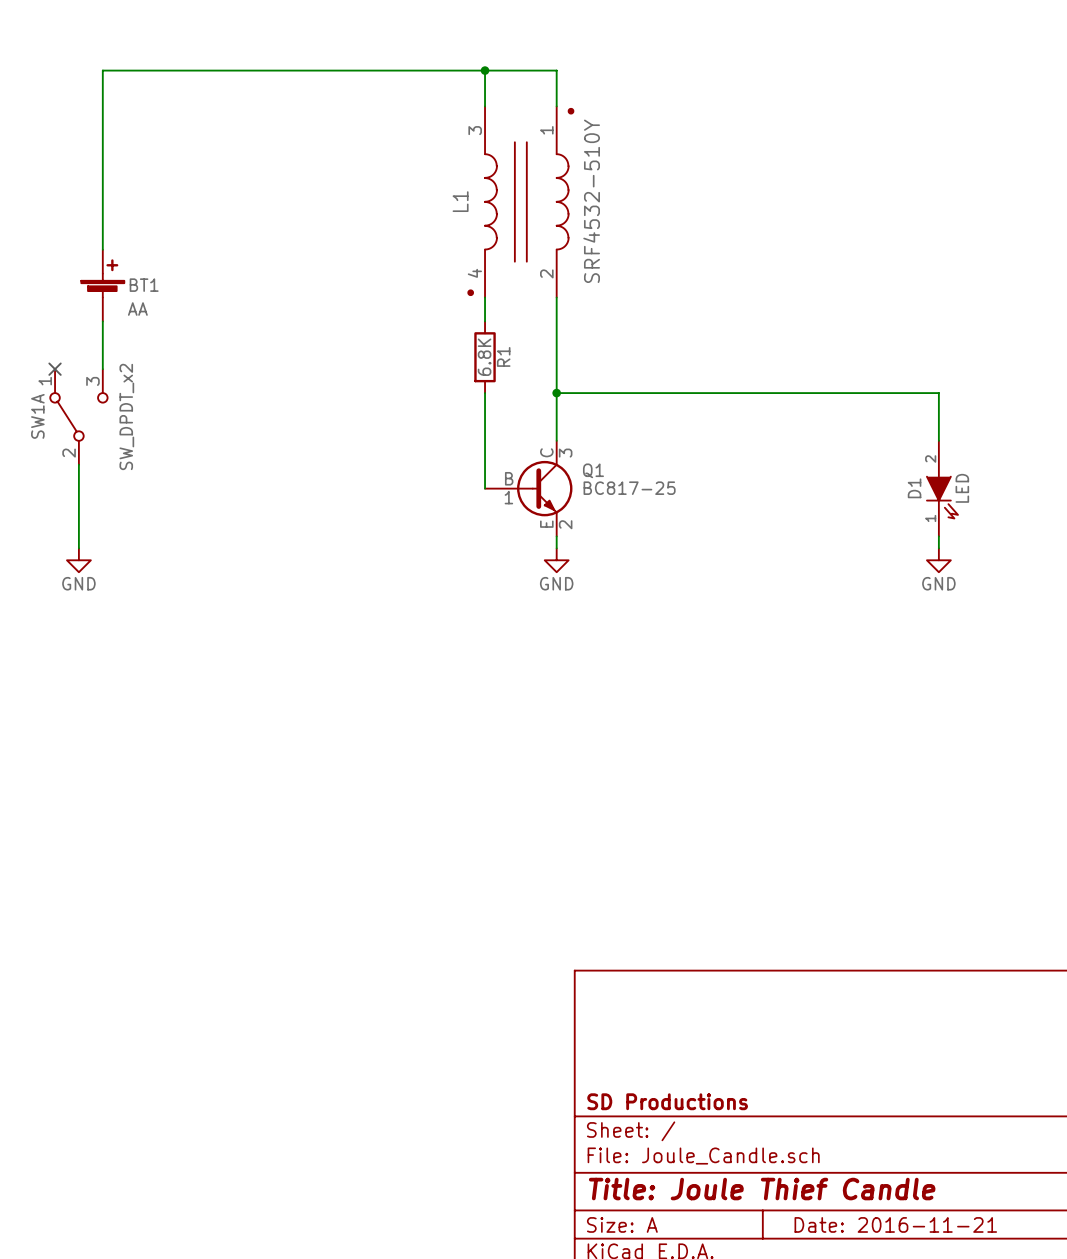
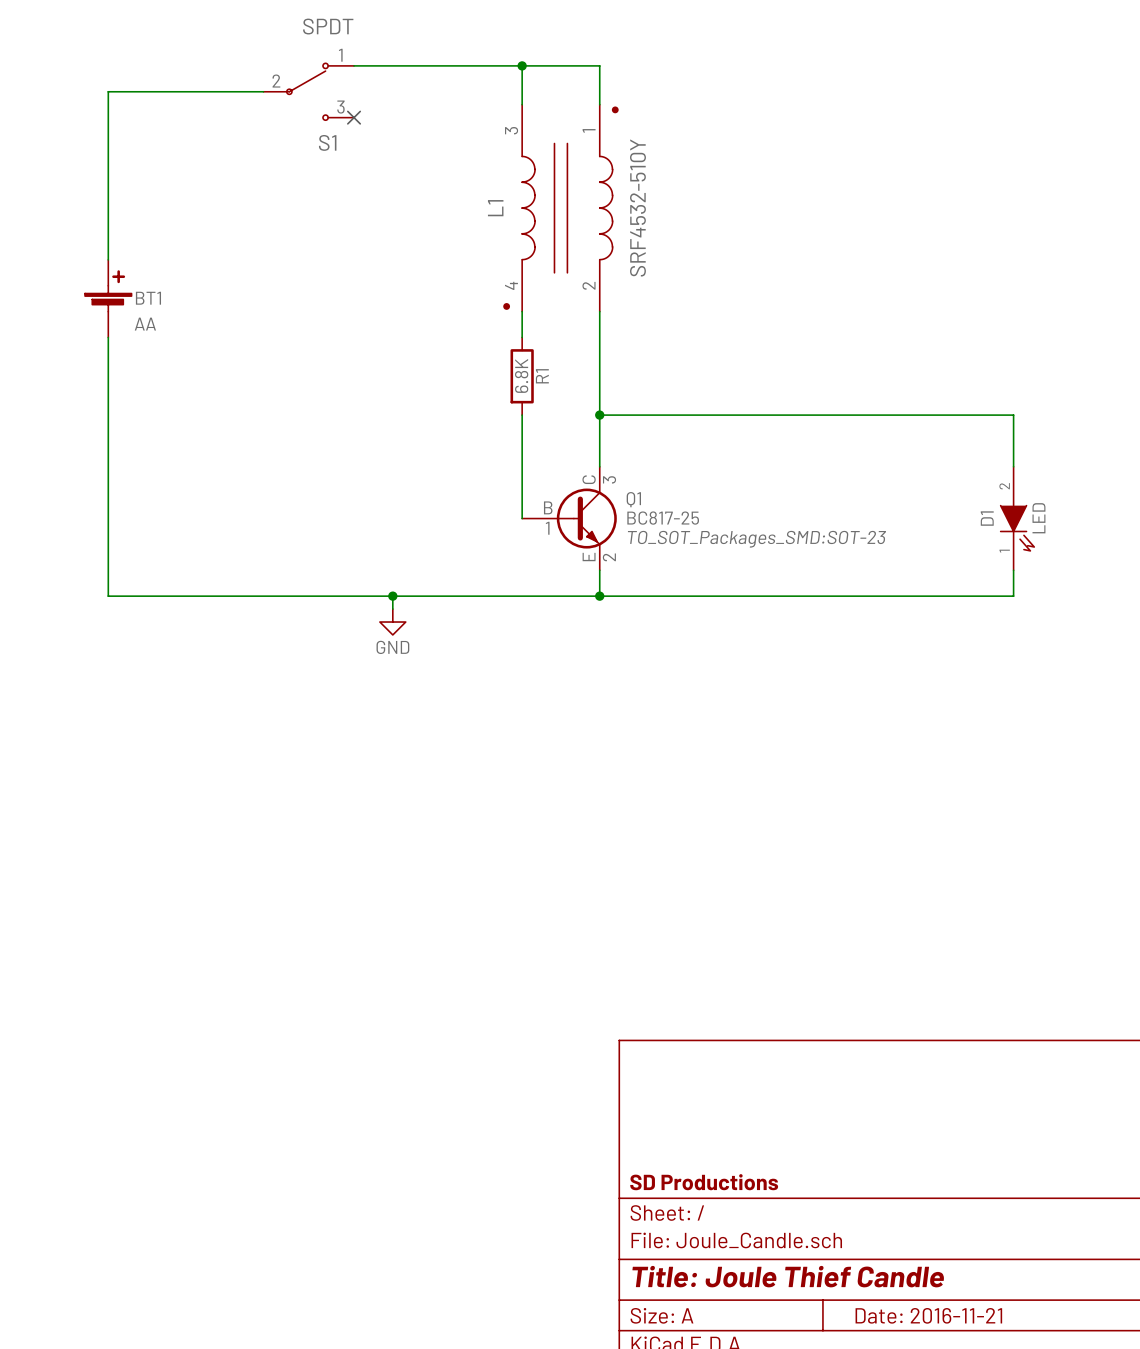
wire: (329, 70) (102, 70) (102, 94) -> (263, 91) (108, 91)
S1: none -> SPDT (308, 91)
no-connect mark: none -> (354, 117)
no-connect mark: (55, 369) -> none
wire: none -> (108, 389) (108, 596) (1013, 596) (1013, 583)
SW1A: SW_DPDT_x2 (78, 416) -> none
wire: (78, 464) (78, 548) -> none
Q1 text: none -> TO_SOT_Packages_SMD:SOT-23 (756, 539)
power symbol: GND (78, 560) -> none
wire: none -> (392, 596) (392, 609)
junction: none -> (392, 596)
power symbol: GND (556, 560) -> none
junction: none -> (599, 596)
power symbol: GND (938, 560) -> none
power symbol: none -> GND (392, 622)

